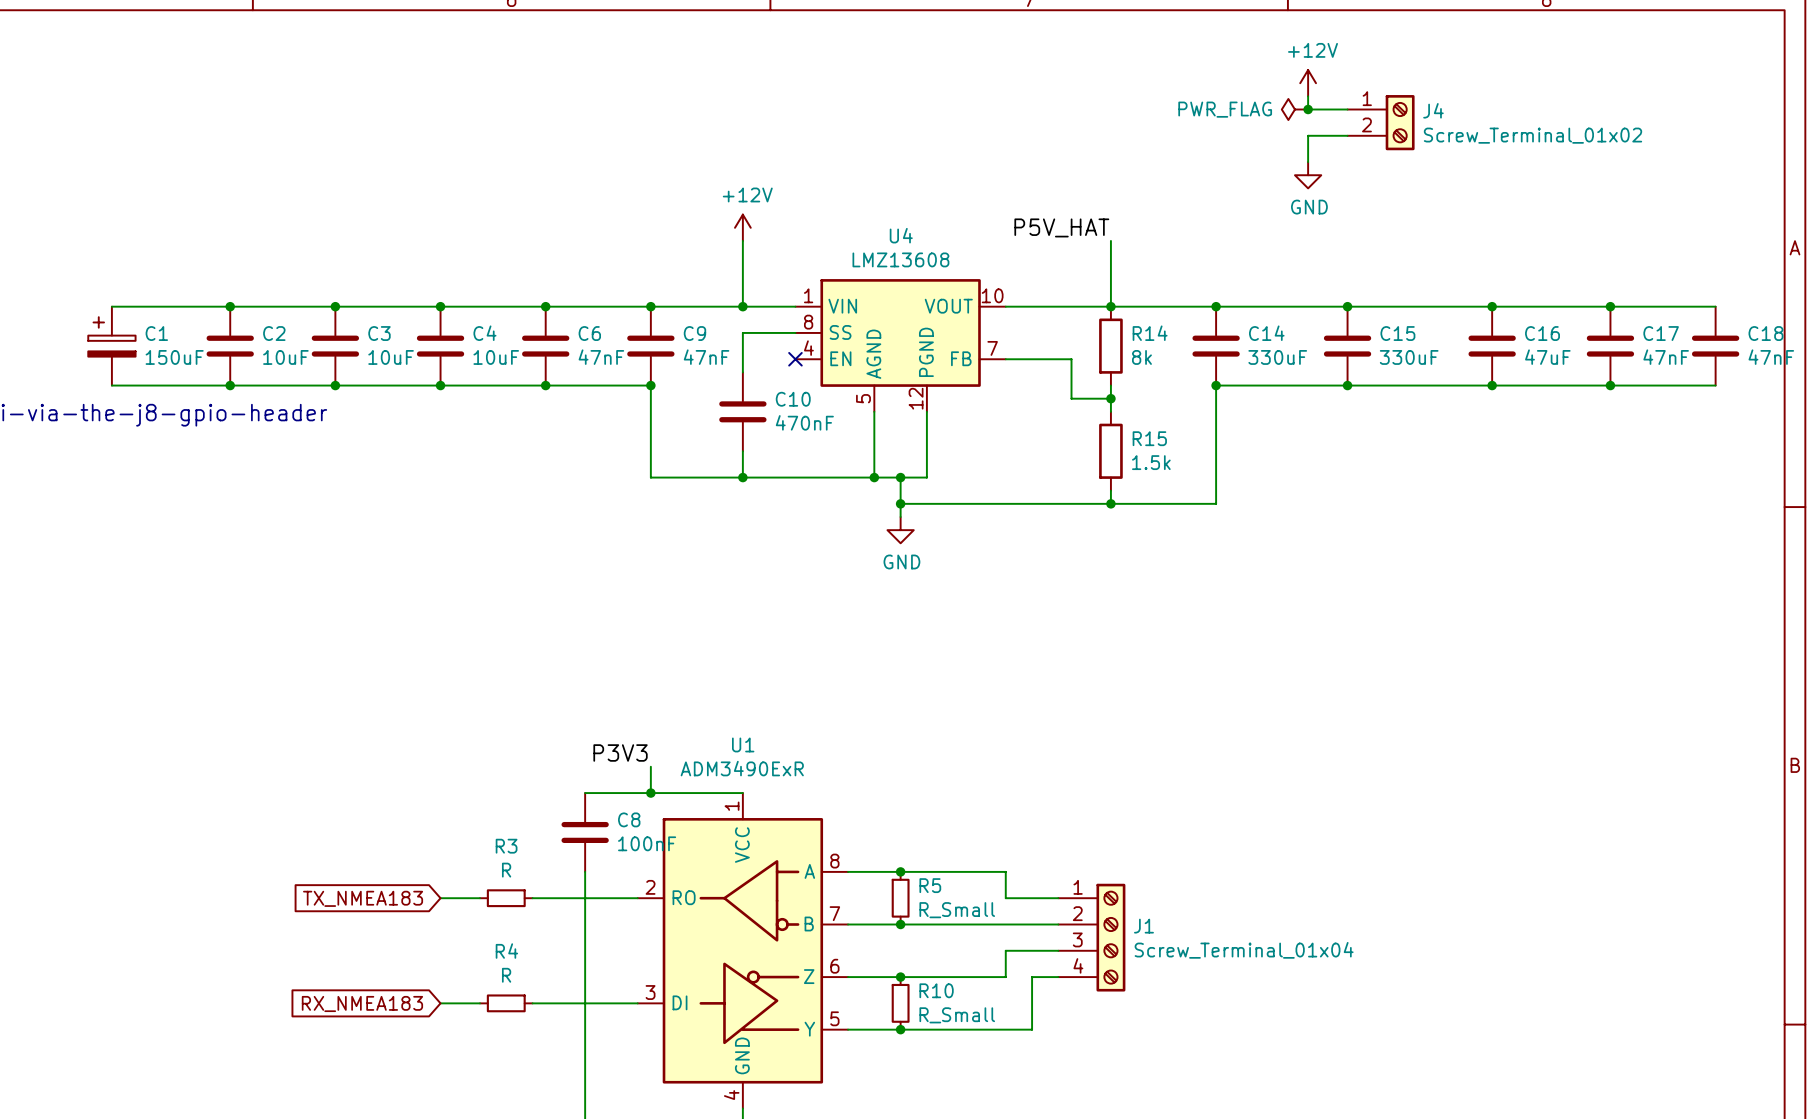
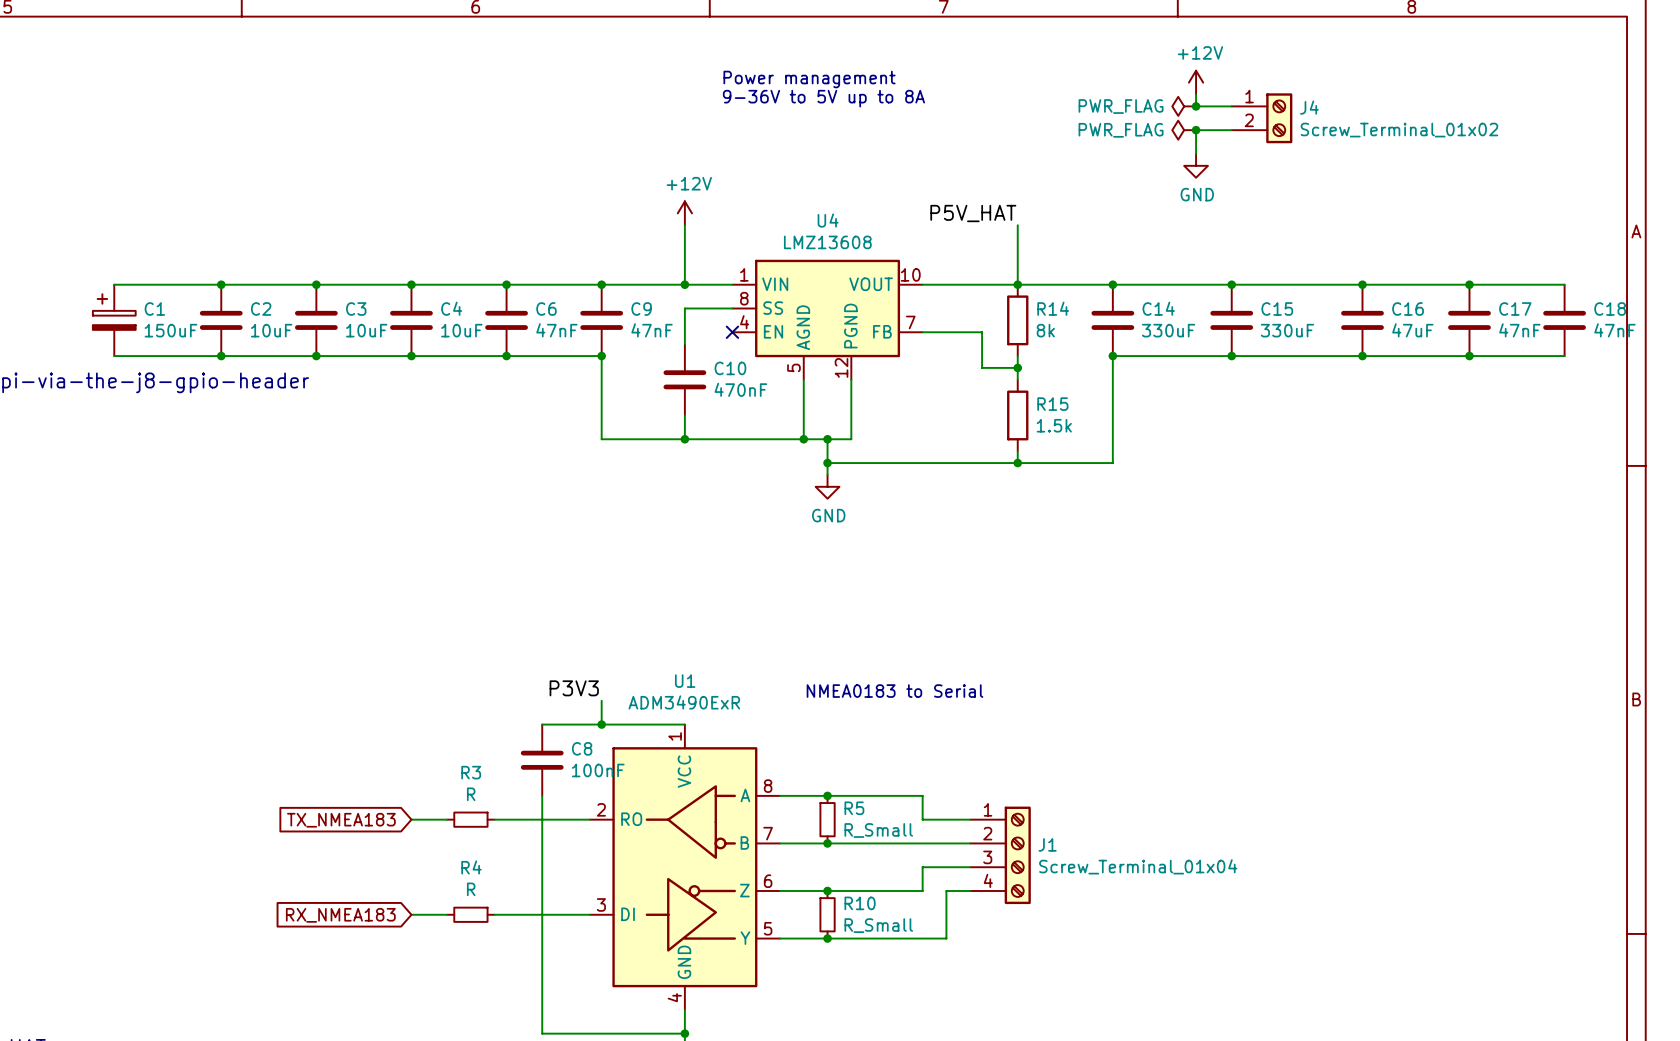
text: none -> Power management (809, 79)
text: none -> 9-36V to 5V up to 8A (823, 98)
power symbol: none -> PWR_FLAG (1184, 130)
junction: none -> (1196, 130)
text: none -> NMEA0183 to Serial (895, 691)

